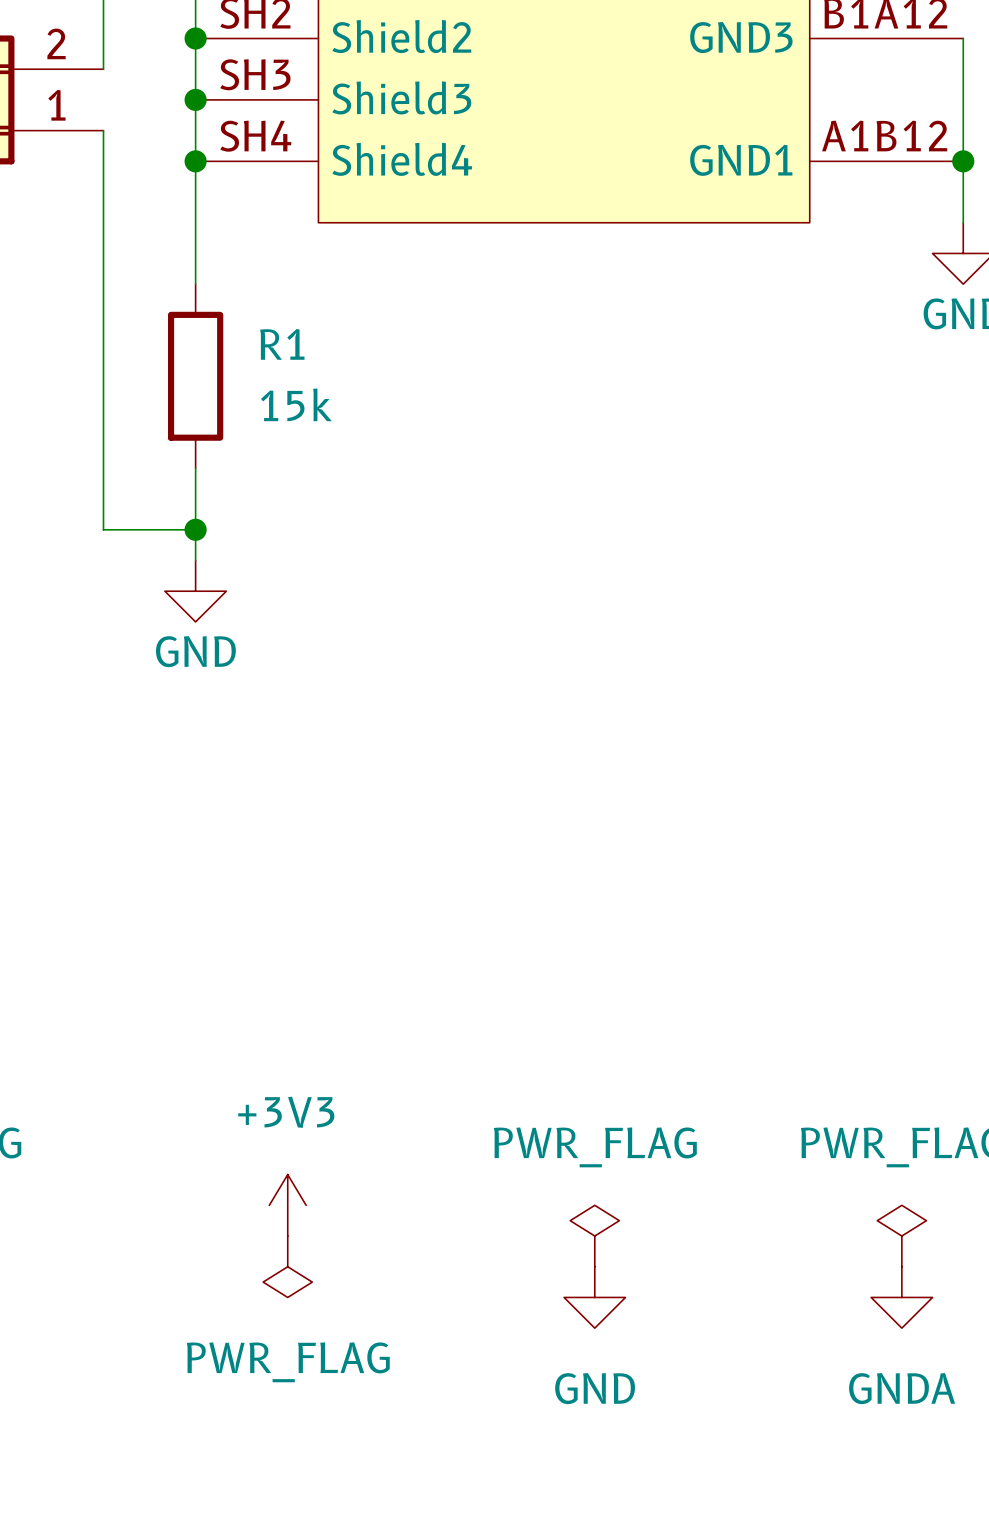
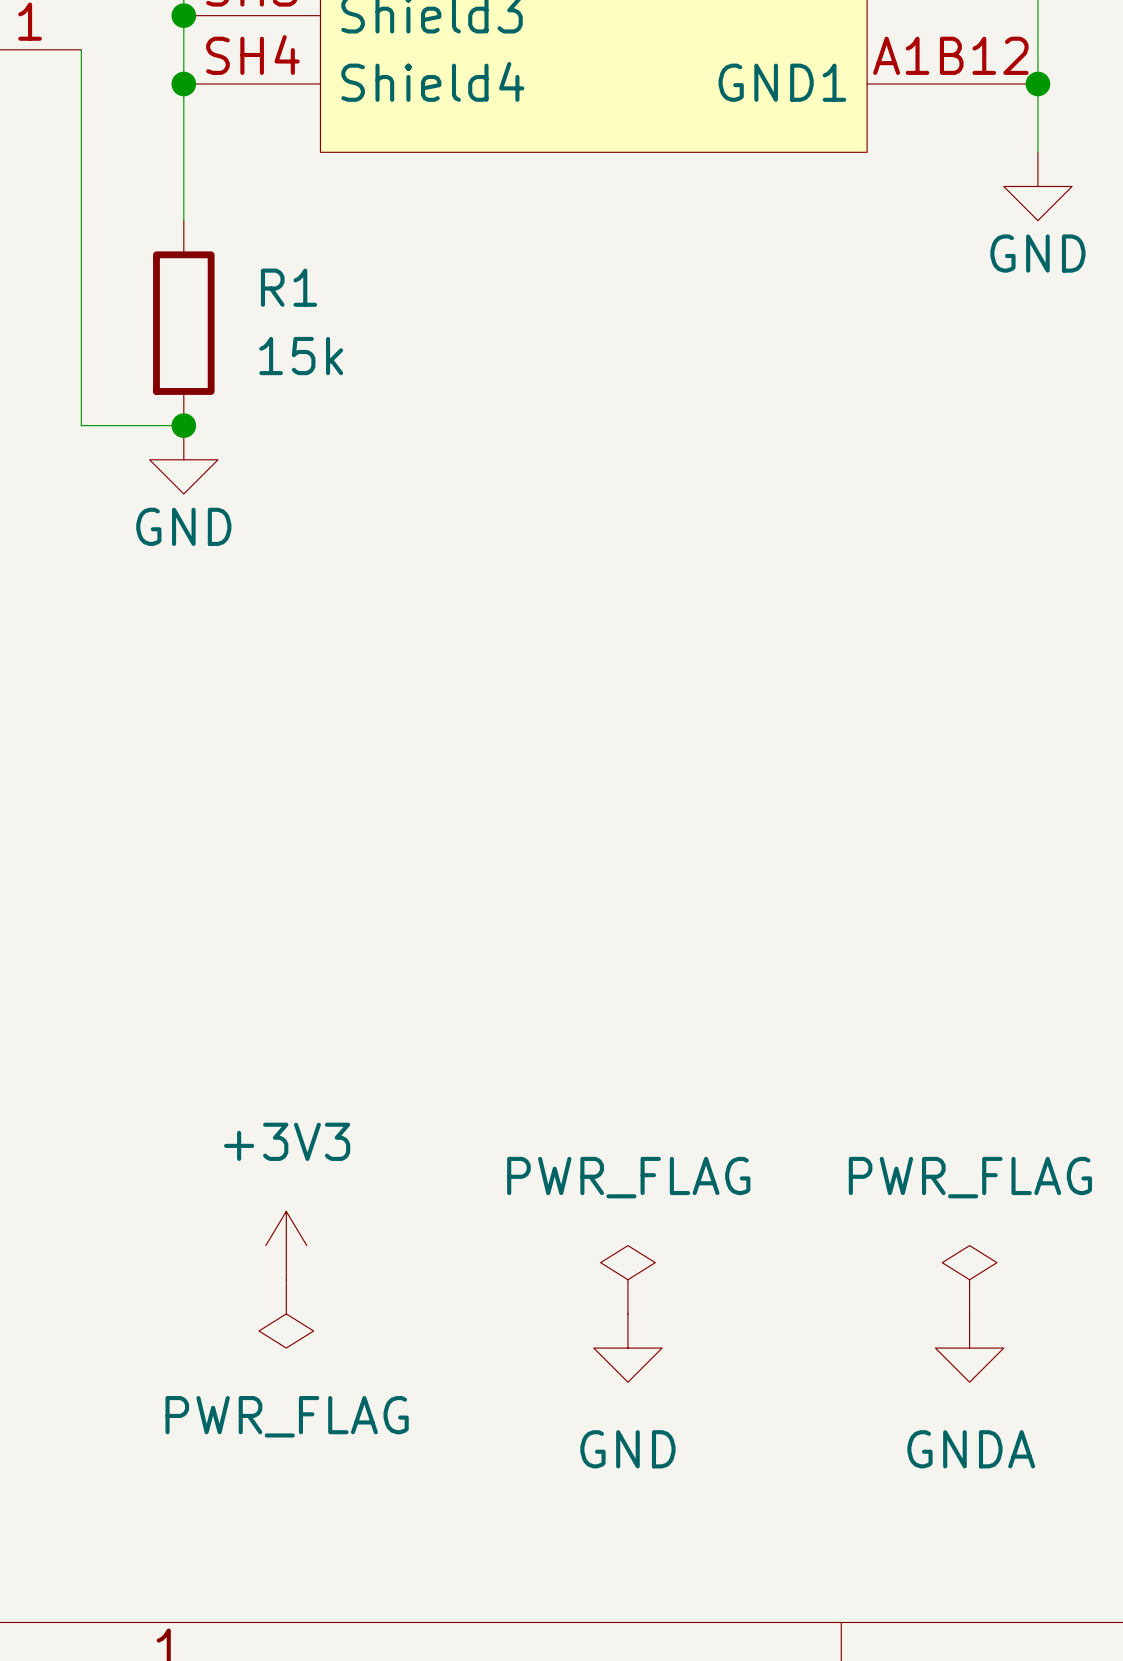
wire: (103, 468) (103, 529) (195, 529) -> (81, 425) (183, 425)
wire: (195, 468) (195, 560) -> none
junction position: (195, 529) -> (183, 425)
power symbol position: GND (195, 591) -> GND (183, 459)

